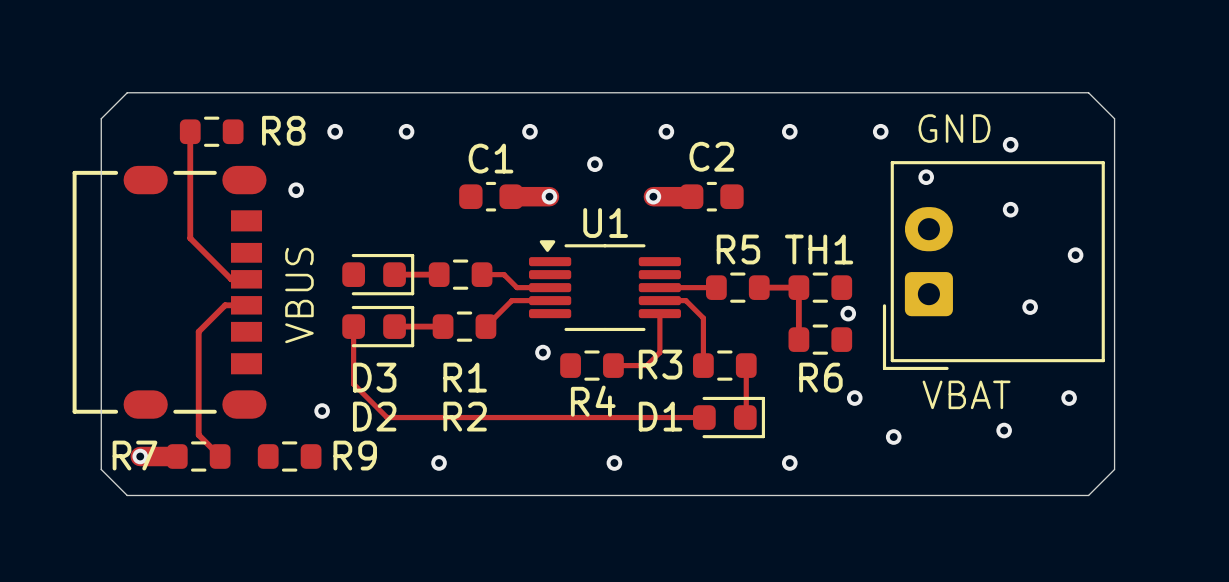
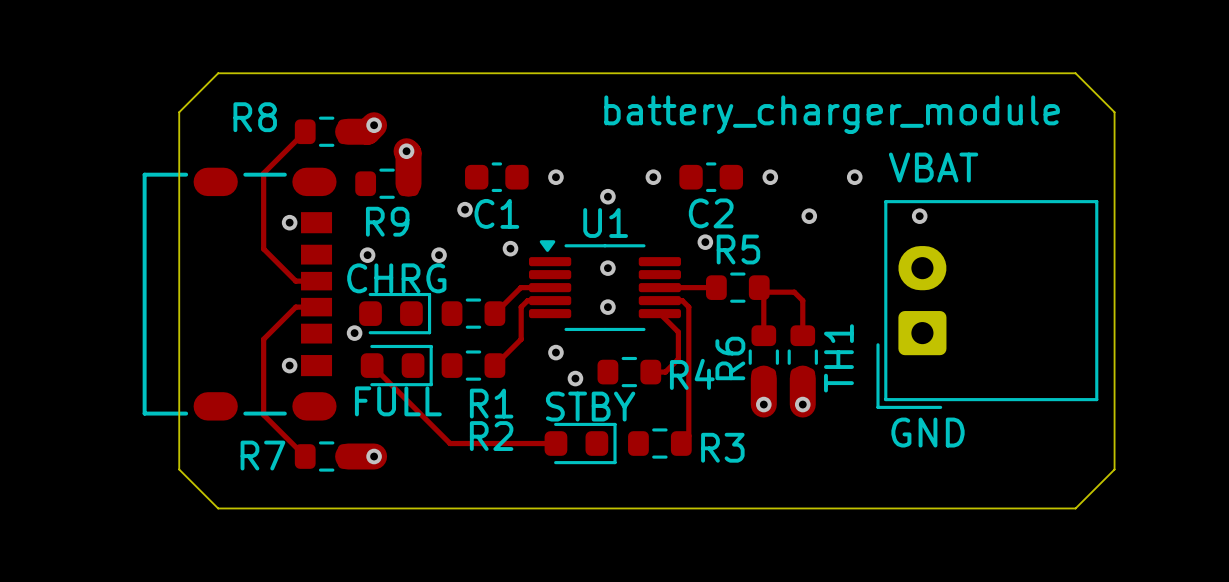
text: none -> battery_charger_module (832, 114)
board edge: (1114, 118) (1088, 92) (127, 92) (101, 118) (101, 469) (127, 495) (1088, 495) -> (1114, 118) (1114, 112) (1075, 73) (218, 73) (179, 112) (179, 469) (218, 508) (1075, 508) (1088, 495)
track: none -> (374, 125) (367, 131) (348, 131)
via: none -> (374, 125)
text position: GND (954, 128) -> GND (928, 432)
R8 name position: R8 (283, 130) -> R8 (255, 117)
track: (190, 131) (190, 238) (231, 279) (246, 279) -> none
R8 position: (211, 131) -> (326, 131)
track: none -> (305, 131) (263, 173) (263, 248) (295, 281) (316, 281)
via: (335, 131) -> none
via: (406, 131) -> none
via: (529, 131) -> none
via: (666, 131) -> none
via: (789, 131) -> none
via: (880, 131) -> none
via: (1010, 144) -> none
track: none -> (406, 151) (408, 153) (408, 183)
via: none -> (406, 151)
C2 name position: C2 (711, 156) -> C2 (711, 213)
C1 name position: C1 (491, 158) -> C1 (496, 213)
via: (594, 164) -> none
via: none -> (555, 177)
via: none -> (770, 177)
via: none -> (854, 177)
via: (926, 177) -> none
via position: (296, 190) -> (289, 222)
C1 position: (491, 196) -> (496, 177)
track: (511, 196) (549, 196) -> none
via: (549, 196) -> none
via: none -> (607, 196)
track: (653, 196) (691, 196) -> none
via position: (653, 196) -> (653, 177)
C2 position: (711, 196) -> (711, 177)
via: none -> (465, 209)
via: (1010, 209) -> none
via: none -> (809, 216)
via: none -> (919, 216)
via: none -> (705, 242)
via: none -> (510, 248)
via: none -> (367, 255)
via: none -> (439, 255)
via: (1075, 255) -> none
part position: (993, 265) -> (987, 304)
via: none -> (607, 268)
D3: (378, 274) -> none
track: (394, 274) (439, 274) -> none
R1 position: (460, 274) -> (473, 313)
track: (482, 274) (503, 274) (516, 287) (520, 287) -> (494, 313) (520, 287)
text: none -> CHRG (396, 278)
track: (759, 287) (798, 287) (798, 339) -> none
TH1 rotation: 0° (820, 287) -> 90° clockwise (802, 357)
TH1 position: (820, 287) -> (802, 357)
part position: (169, 292) -> (239, 294)
text: VBUS (299, 295) -> none
track: (527, 300) (511, 300) (485, 326) -> (527, 300) (521, 307) (521, 339) (494, 365)
track: (682, 300) (685, 300) (703, 318) (703, 365) -> (682, 300) (688, 307) (688, 436) (681, 443)
track: (246, 305) (225, 305) (198, 331) (198, 435) (220, 456) -> none
track: none -> (316, 307) (295, 307) (263, 339) (263, 414) (305, 456)
via: none -> (607, 307)
via: (1030, 307) -> none
part: none -> (395, 313)
track: (659, 313) (659, 352) (646, 365) (613, 365) -> (659, 313) (678, 332) (678, 359) (665, 372) (650, 372)
via: (848, 313) -> none
track: (353, 326) (353, 384) (387, 417) (704, 417) -> none
D2: (378, 326) -> none
track: (394, 326) (443, 326) -> none
R2 position: (464, 326) -> (473, 365)
via: none -> (354, 333)
track: none -> (763, 335) (763, 292) (794, 292) (802, 300) (802, 335)
R6 rotation: 0° (820, 339) -> 90° clockwise (763, 357)
R6 position: (820, 339) -> (763, 357)
via position: (542, 352) -> (555, 352)
R3 name position: R3 (660, 364) -> R3 (722, 447)
via: none -> (289, 365)
track: none -> (372, 365) (450, 443) (555, 443)
part: none -> (396, 365)
R4 position: (592, 365) -> (629, 372)
R3 position: (724, 365) -> (659, 443)
track: (746, 365) (745, 417) -> none
R1 name position: R1 (465, 377) -> R1 (491, 403)
via: none -> (575, 378)
track: none -> (763, 378) (763, 404)
track: none -> (802, 378) (802, 404)
text position: VBAT (966, 394) -> VBAT (933, 167)
via: (854, 398) -> none
via: (1069, 398) -> none
text: none -> FULL (398, 401)
R4 name position: R4 (593, 401) -> R4 (692, 374)
via: none -> (763, 404)
via: none -> (802, 404)
text: none -> STBY (590, 406)
via: (322, 411) -> none
R2 name position: R2 (465, 416) -> R2 (491, 436)
D1: (728, 417) -> none
via: (1004, 430) -> none
via: (893, 437) -> none
part: none -> (580, 443)
R9 name position: R9 (355, 455) -> R9 (387, 221)
track: (140, 456) (177, 456) -> none
via: (140, 456) -> none
R7 position: (198, 456) -> (326, 456)
R9 position: (289, 456) -> (387, 183)
track: none -> (348, 456) (374, 456)
via: none -> (374, 456)
via: (439, 463) -> none
via: (614, 463) -> none
via: (789, 463) -> none

